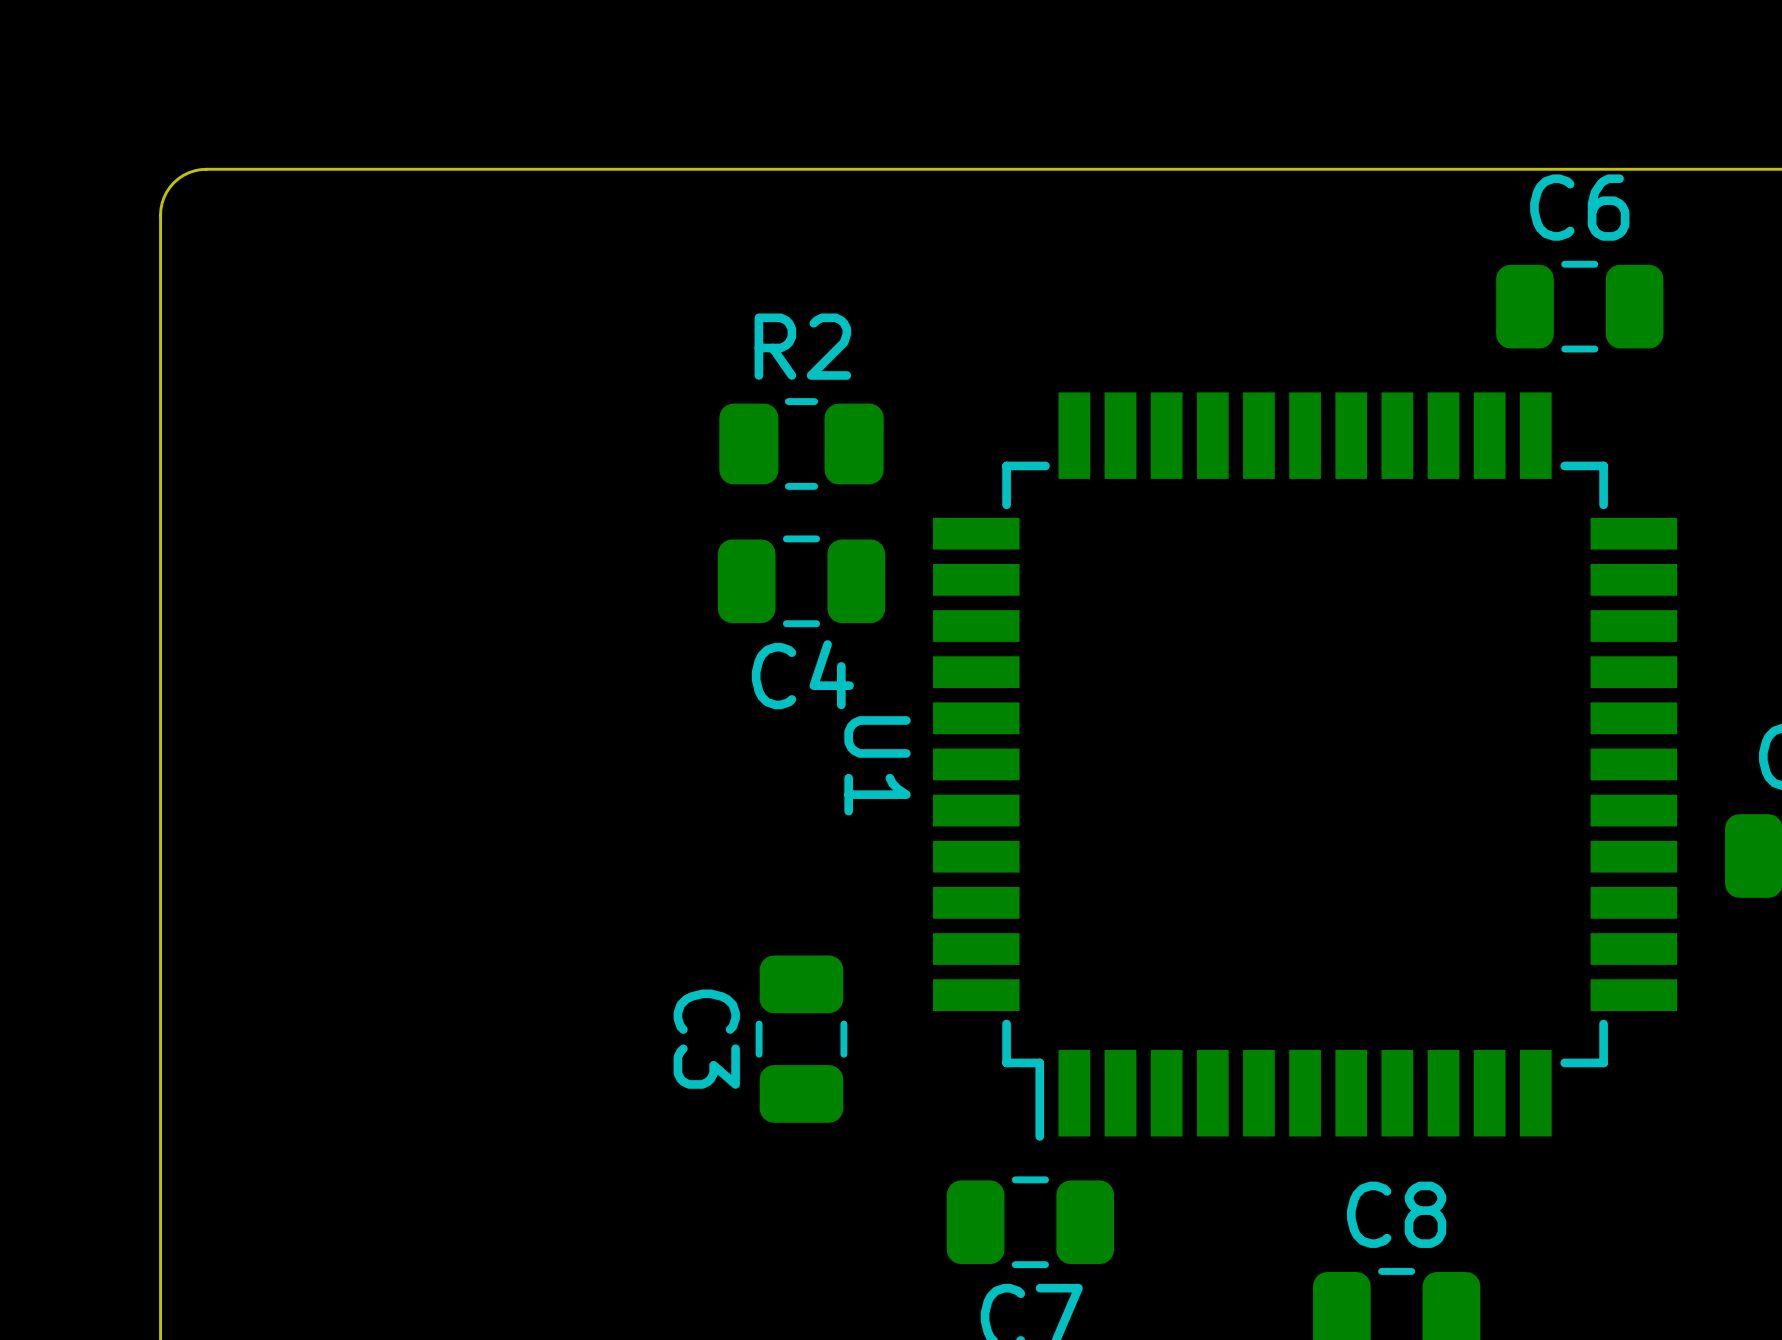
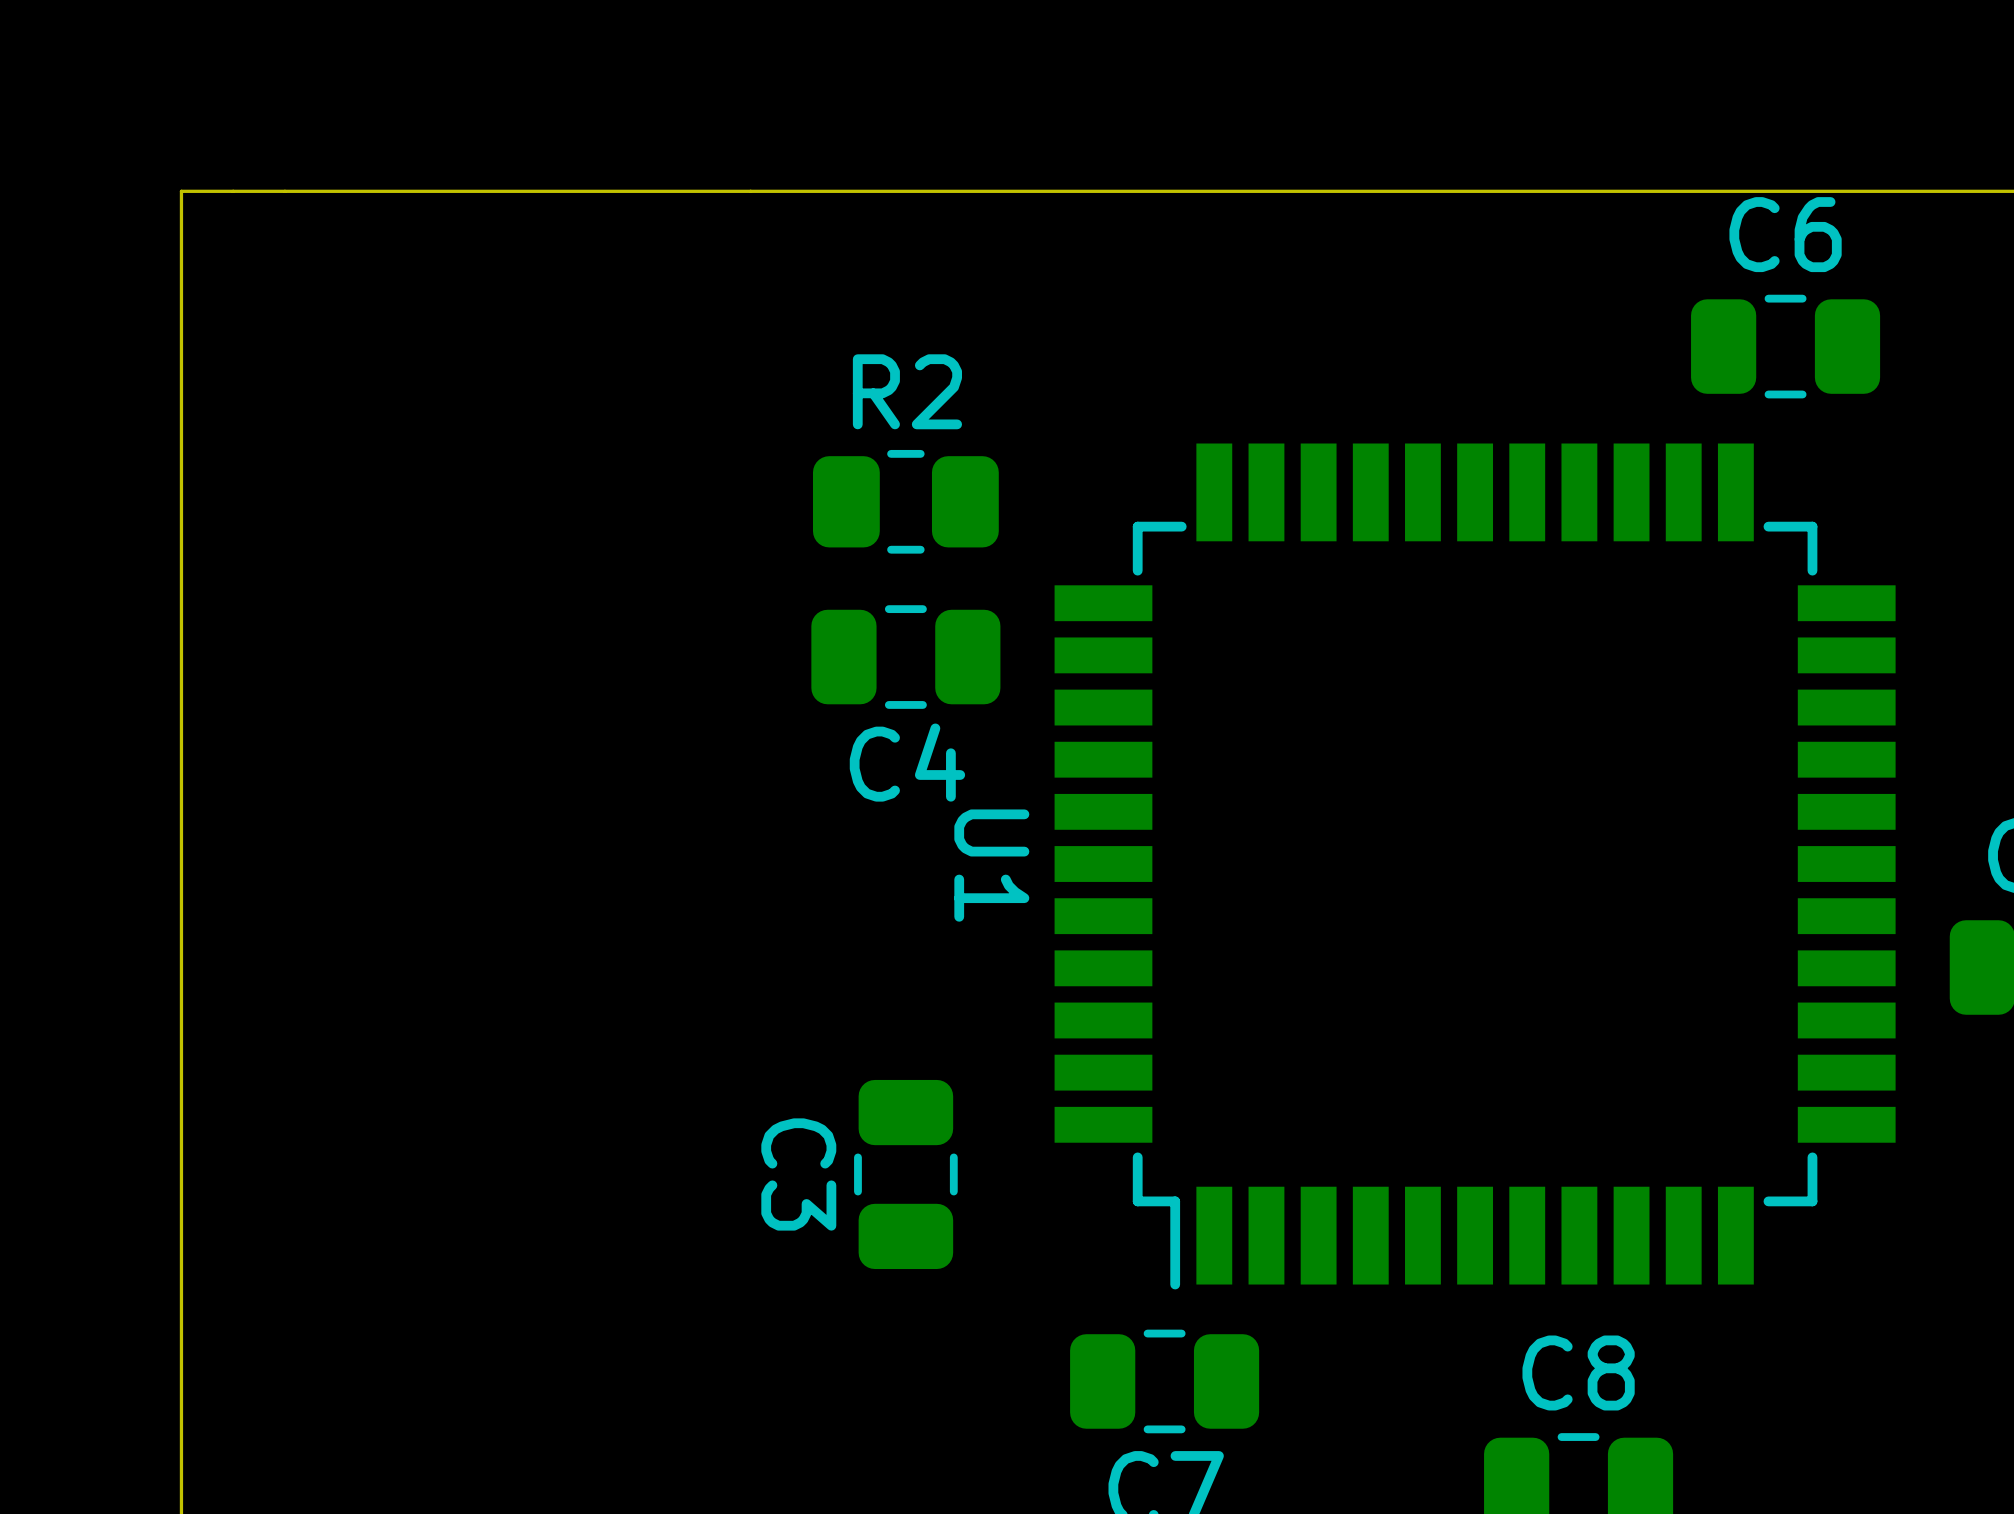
board edge: (206, 169) (188, 172) (173, 182) (164, 197) (160, 215) -> (233, 191) (181, 191) (181, 243)

